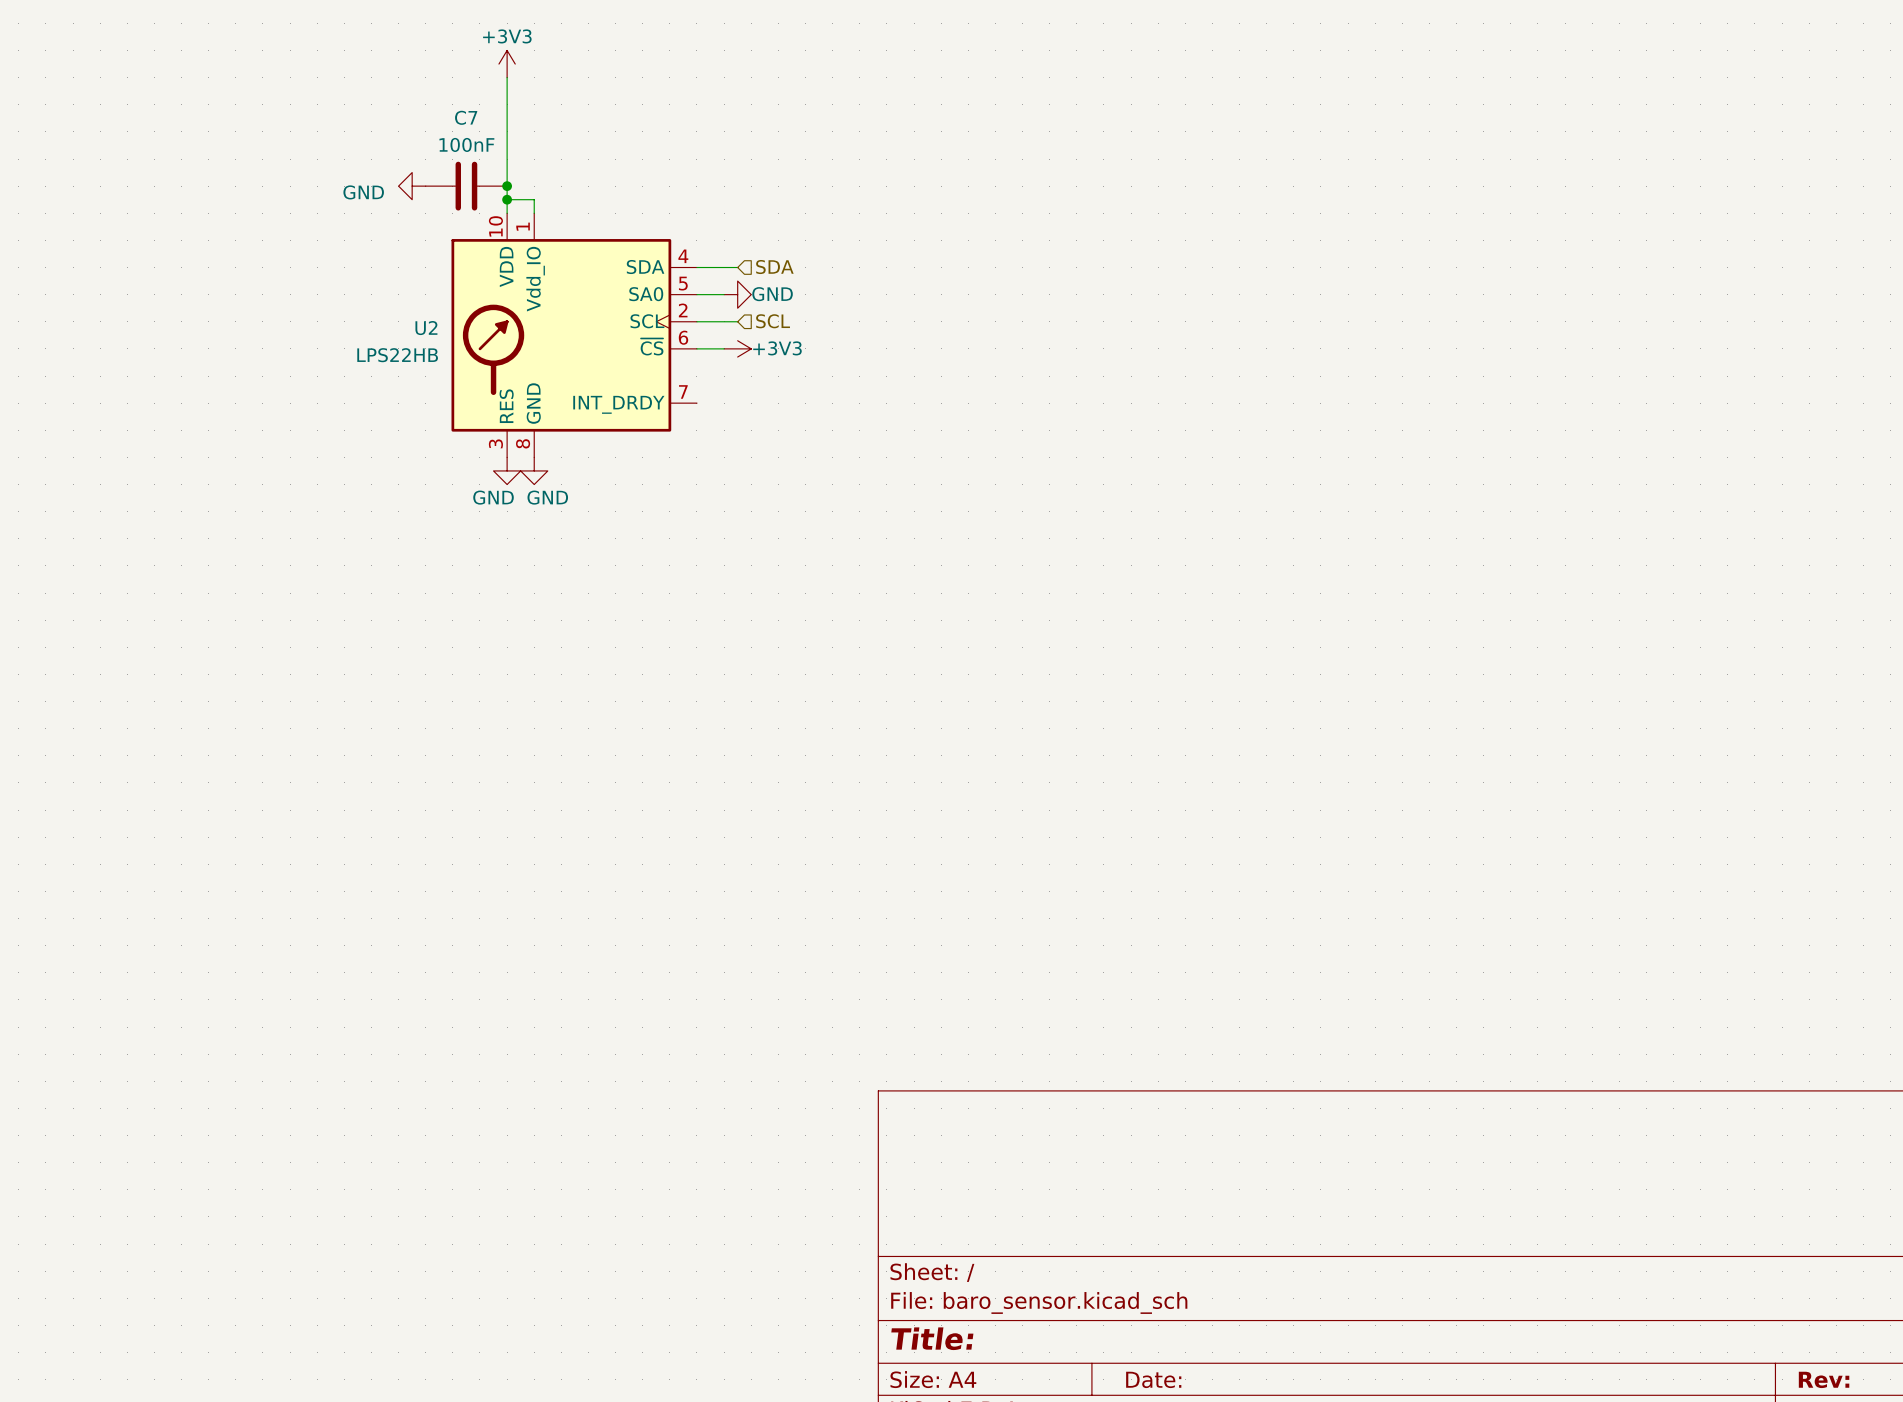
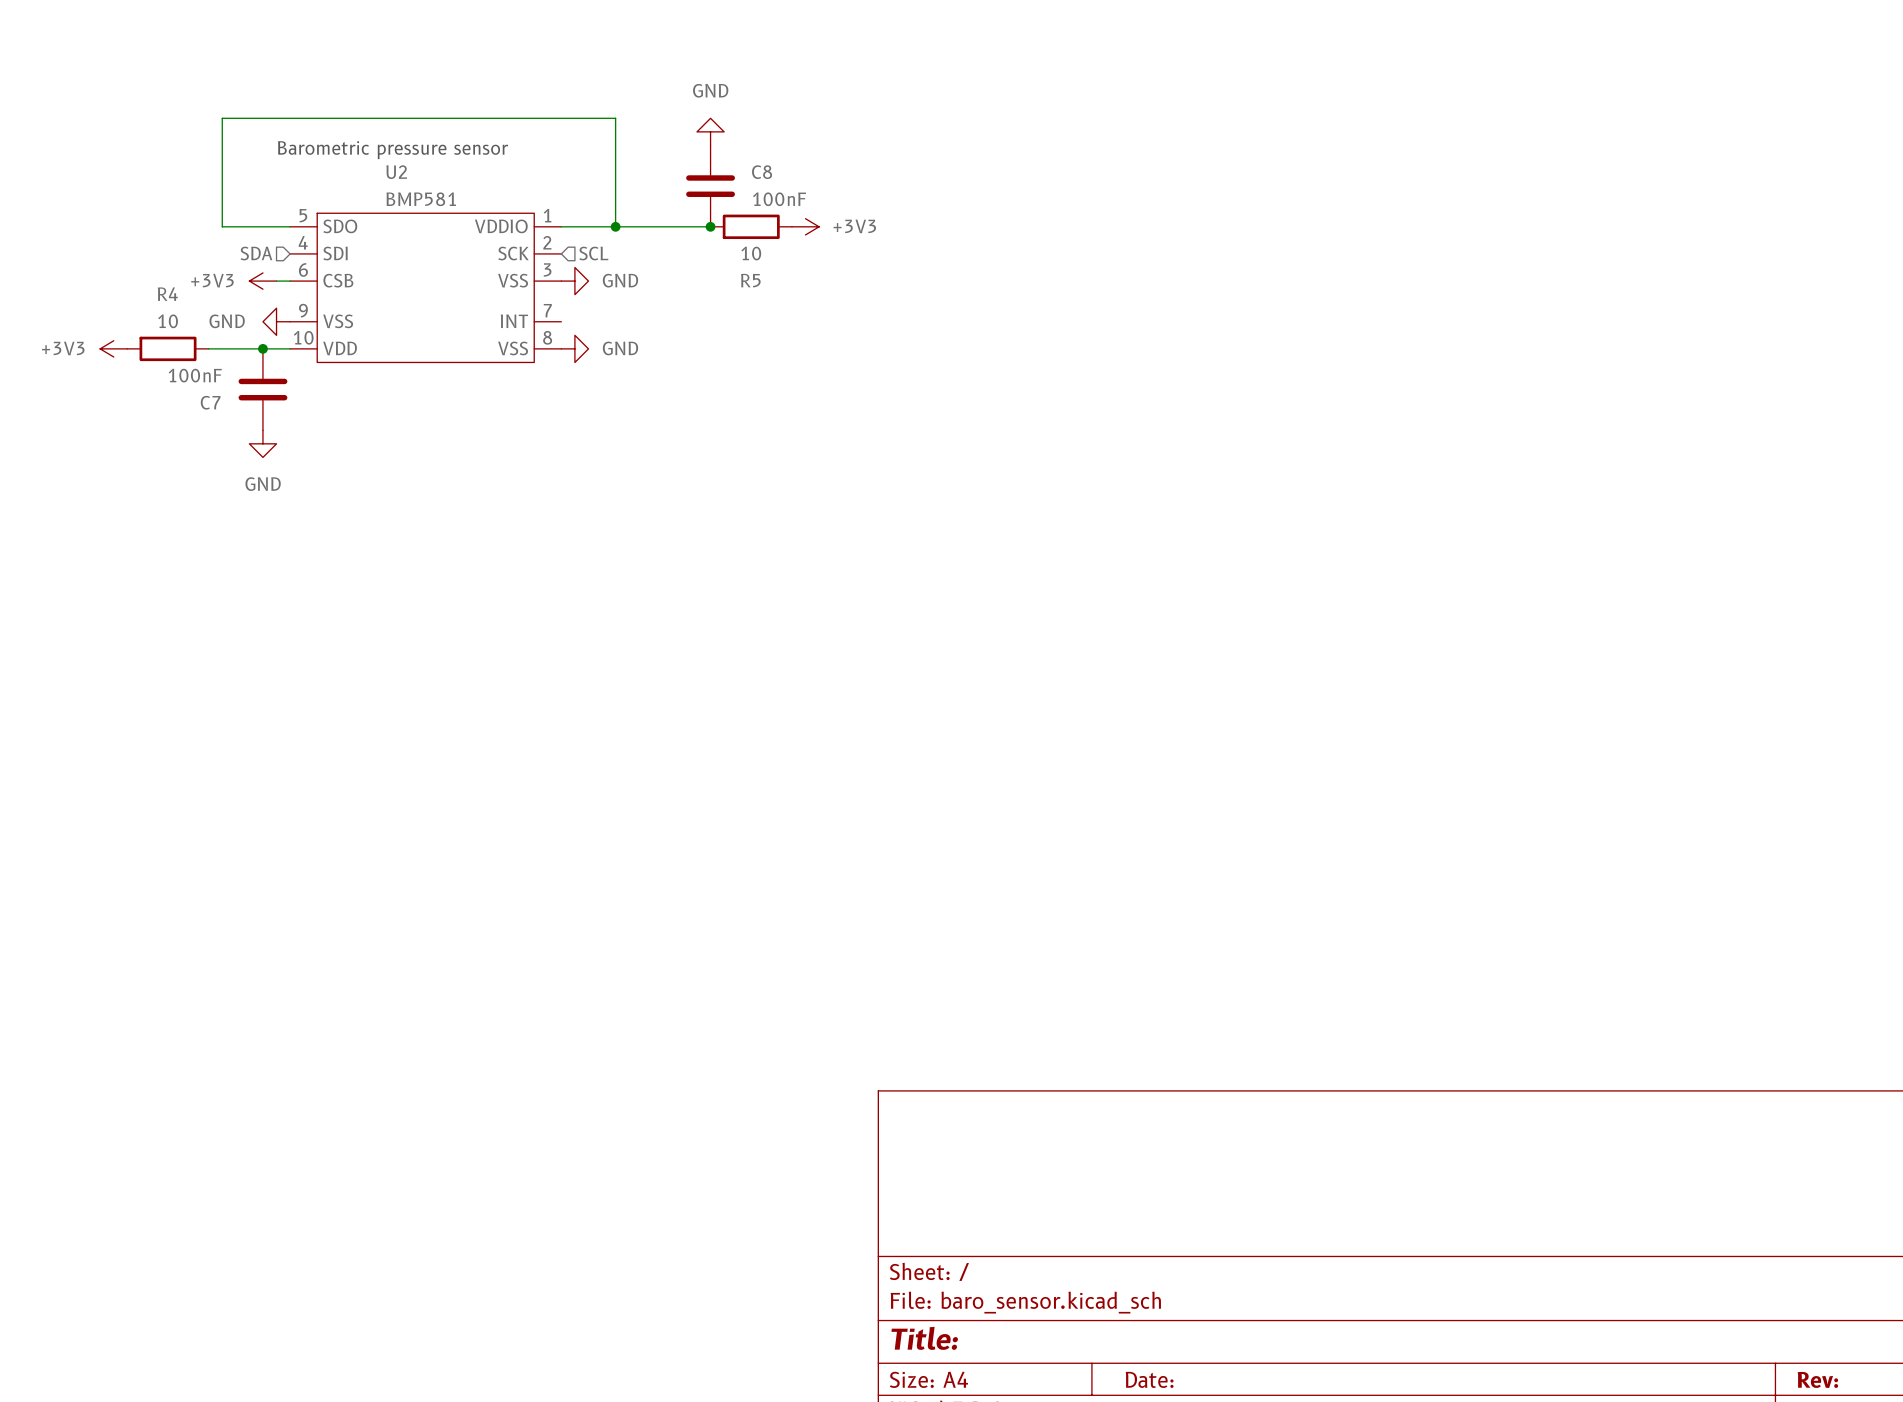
power symbol: +3V3 (507, 64) -> none
wire: (507, 77) (507, 213) -> none
C7 name position: C7 (466, 117) -> C7 (210, 402)
power symbol: none -> GND (710, 131)
C7 value position: 100nF (466, 144) -> 100nF (195, 375)
text: none -> Barometric pressure sensor (393, 150)
power symbol: GND (412, 186) -> none
C7 rotation: 0° (466, 186) -> 90° clockwise (262, 389)
C7 position: (466, 186) -> (262, 389)
junction: (507, 186) -> none
C8: none -> 100nF (710, 186)
wire: (507, 199) (534, 199) (534, 213) -> none
junction: (507, 199) -> none
U2 symbol: [451, 213, 697, 458] -> [290, 213, 562, 363]
wire: none -> (290, 226) (222, 226) (222, 118) (615, 118) (615, 226)
wire: none -> (561, 226) (710, 226)
junction: none -> (615, 226)
junction: none -> (710, 226)
R5: none -> 10 (751, 226)
hierarchical label: none -> SDA (256, 253)
wire: (696, 267) (737, 267) -> none
hierarchical label: SDA (774, 267) -> none
power symbol: none -> +3V3 (262, 281)
wire: none -> (276, 281) (290, 281)
power symbol: none -> GND (574, 281)
wire: (696, 294) (724, 294) -> none
power symbol: GND (737, 294) -> none
power symbol: none -> GND (276, 321)
wire: (696, 321) (737, 321) -> none
hierarchical label position: SCL (773, 321) -> SCL (593, 253)
U2 name position: U2 (426, 328) -> U2 (396, 172)
power symbol: none -> +3V3 (113, 348)
R4: none -> 10 (168, 348)
wire: none -> (208, 348) (290, 348)
junction: none -> (262, 348)
power symbol: none -> GND (574, 348)
wire: (696, 348) (724, 348) -> none
power symbol position: +3V3 (737, 348) -> +3V3 (805, 226)
power symbol text position: +3V3 (777, 348) -> +3V3 (854, 226)
U2 value: LPS22HB (397, 355) -> BMP581 (421, 199)
power symbol: none -> GND (262, 443)
power symbol: GND (507, 470) -> none
power symbol: GND (534, 470) -> none

